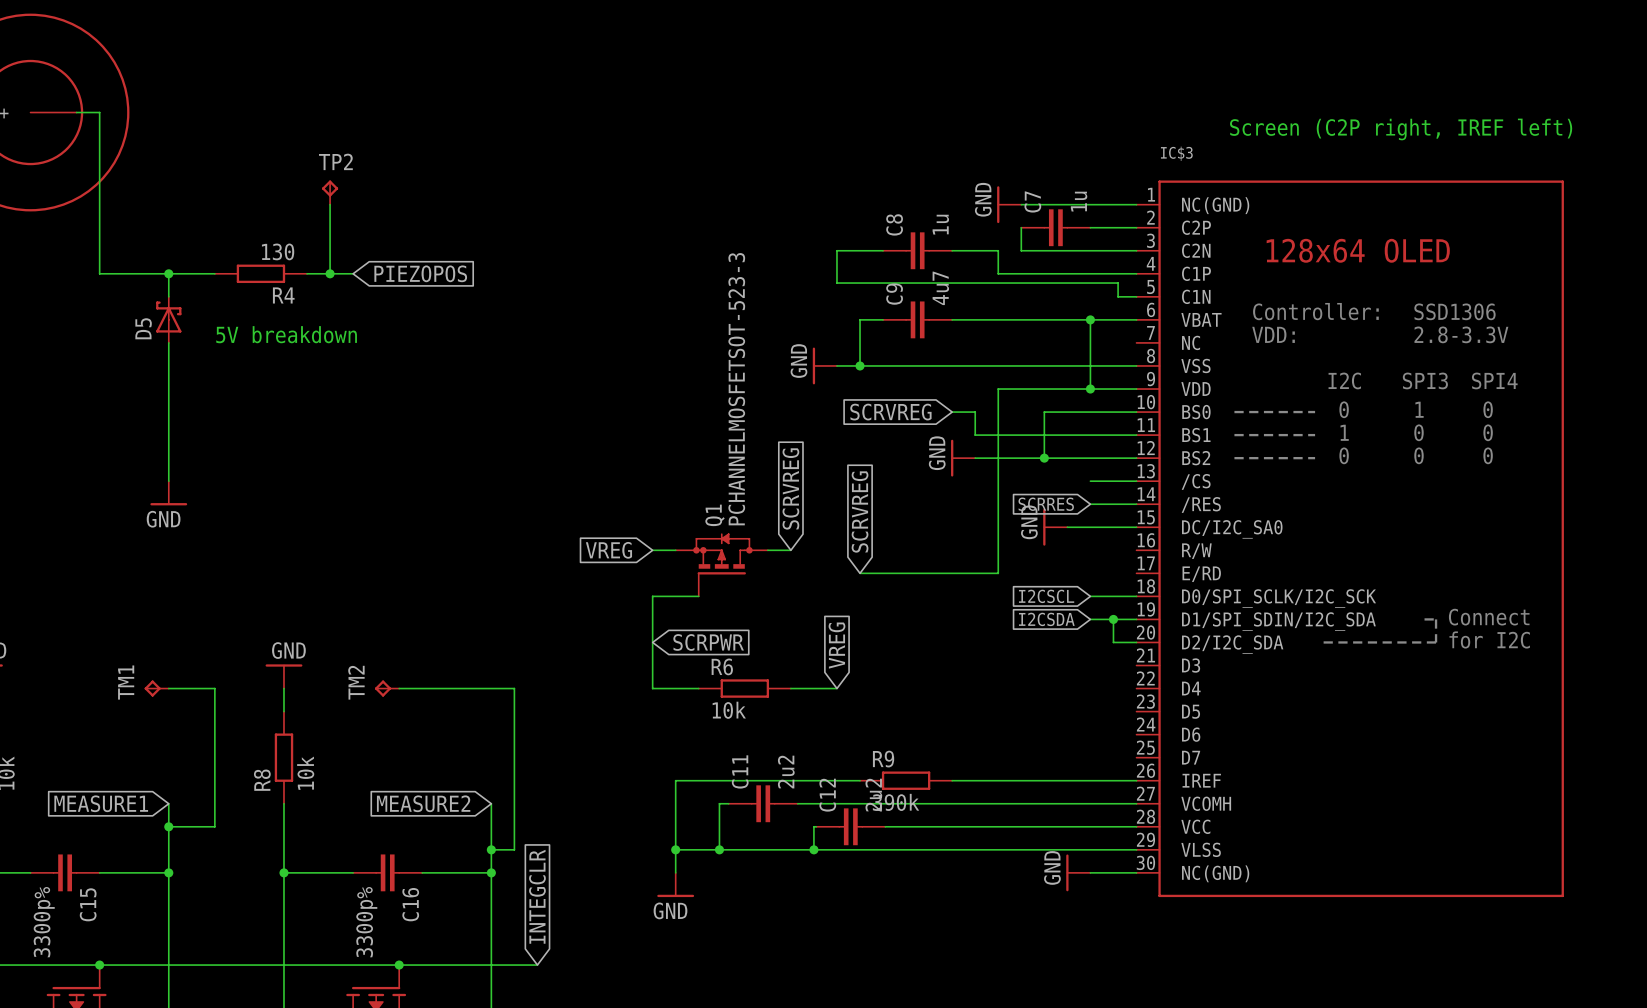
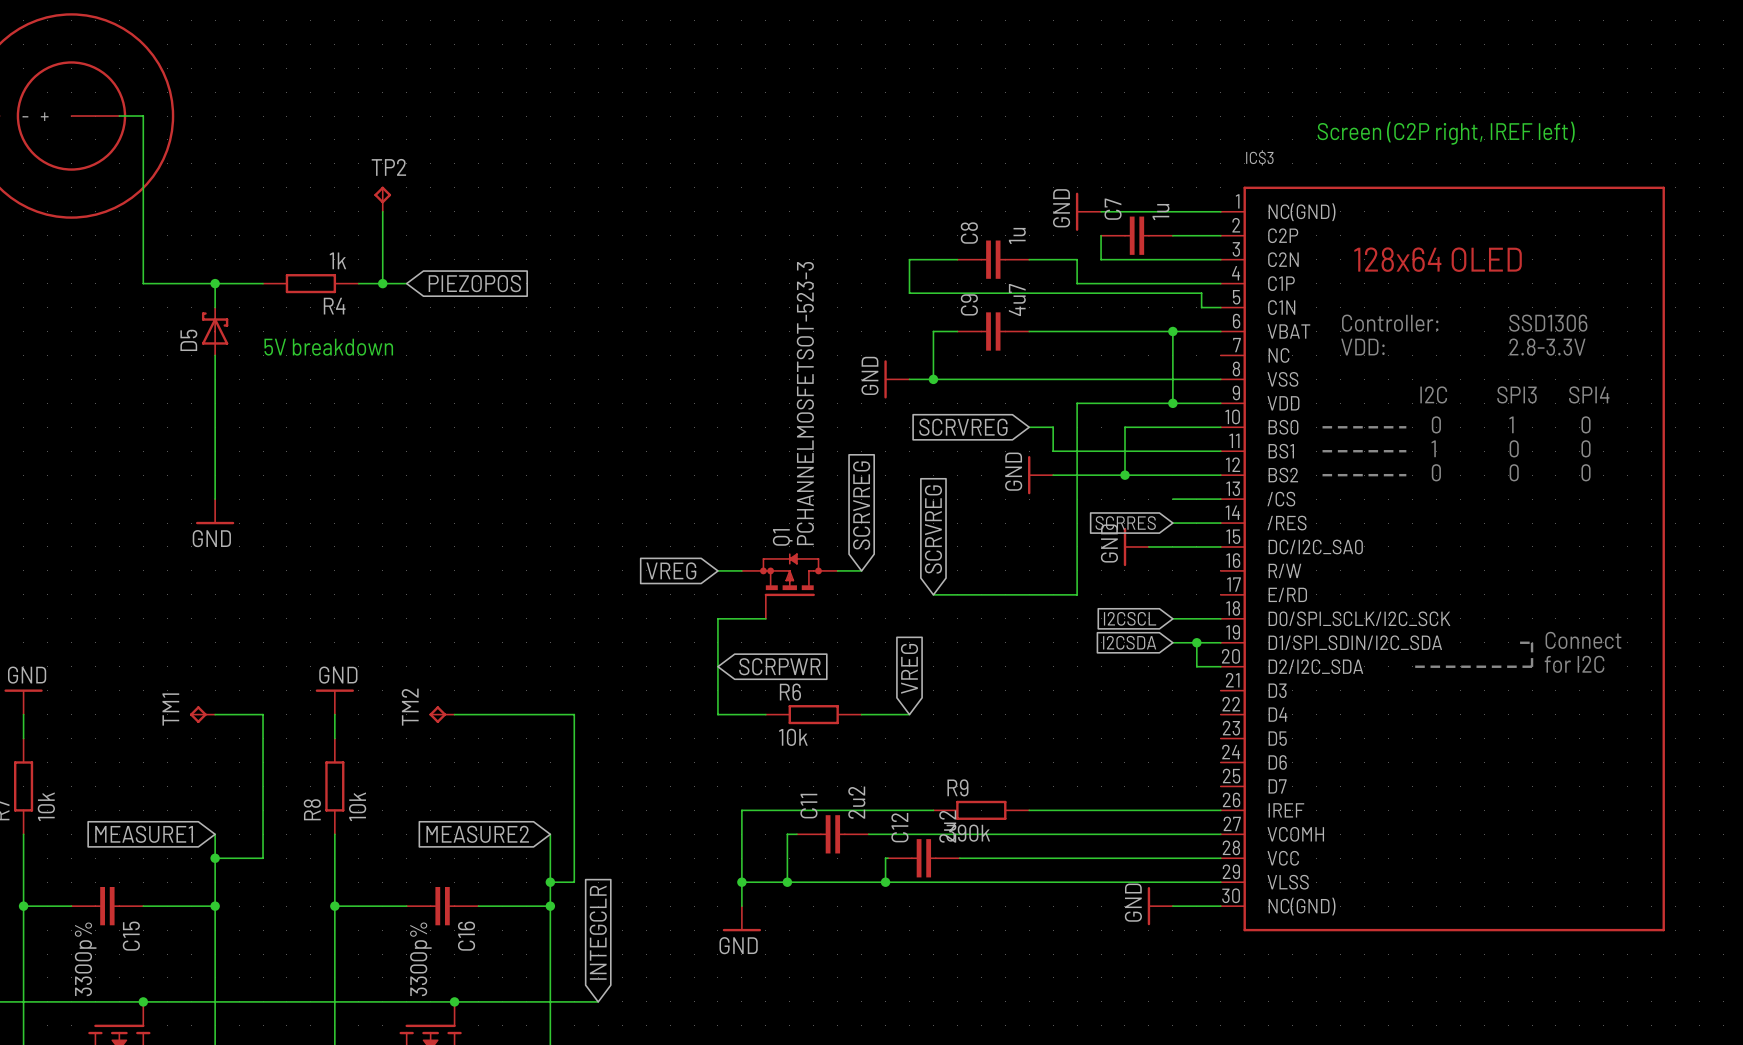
R4 value: 130 (278, 251) -> 1k (337, 260)

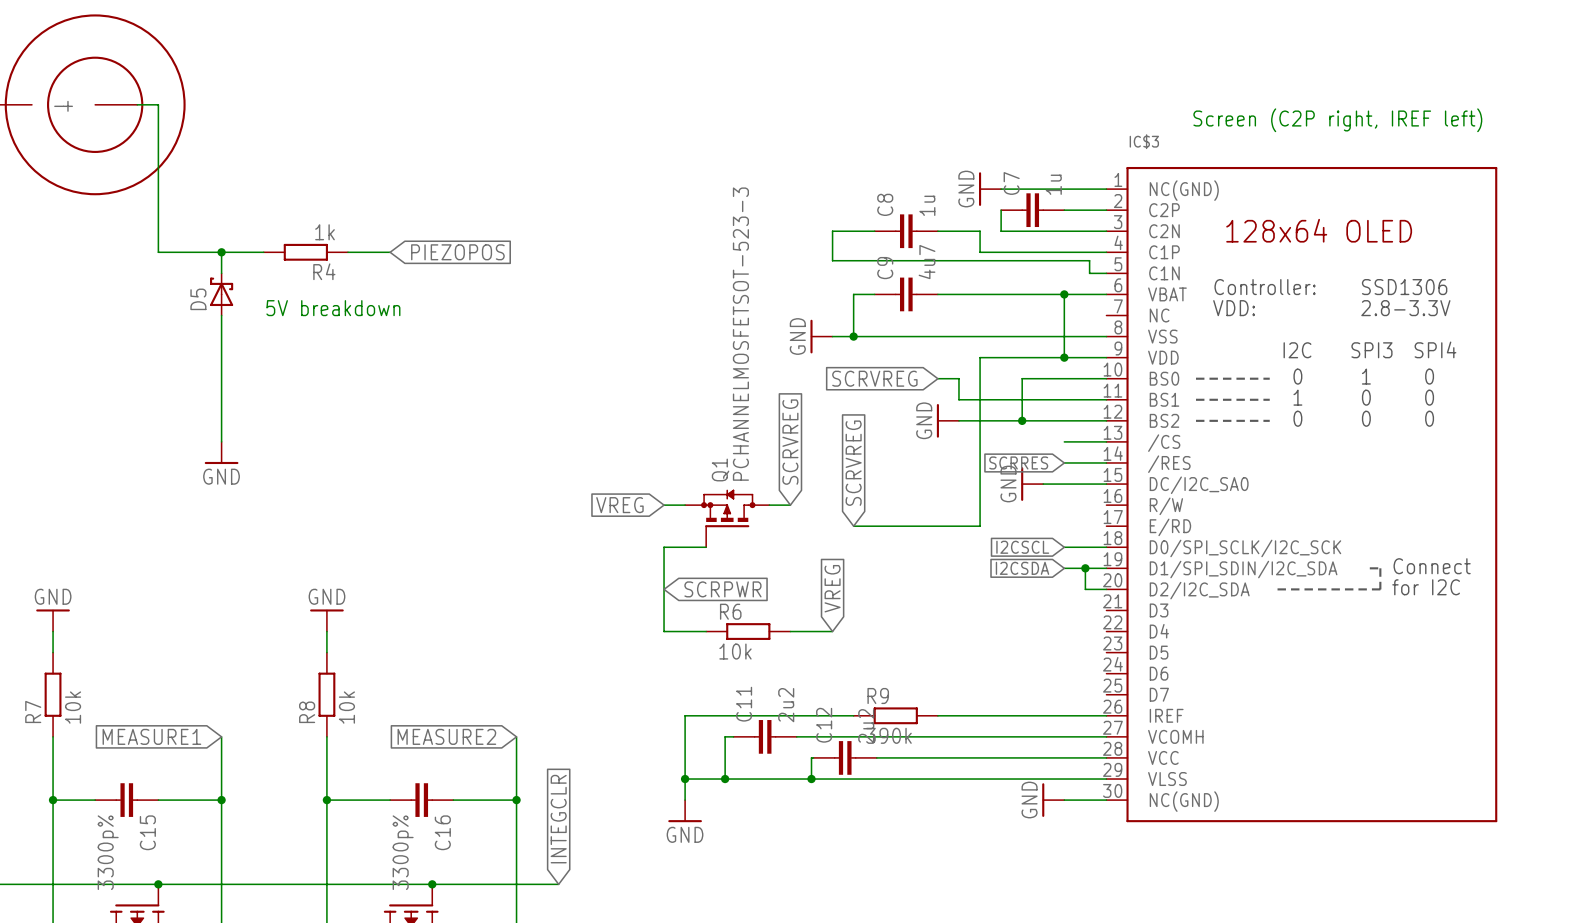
TP2: (382, 199) -> none
wire: (382, 211) (382, 283) -> none
junction: (382, 283) -> none
TM1: (202, 714) -> none
wire: (215, 714) (263, 714) (263, 858) (215, 858) -> none
TM2: (441, 714) -> none
wire: (454, 714) (574, 714) (574, 882) (550, 882) -> none
junction: (215, 858) -> none
junction: (550, 882) -> none

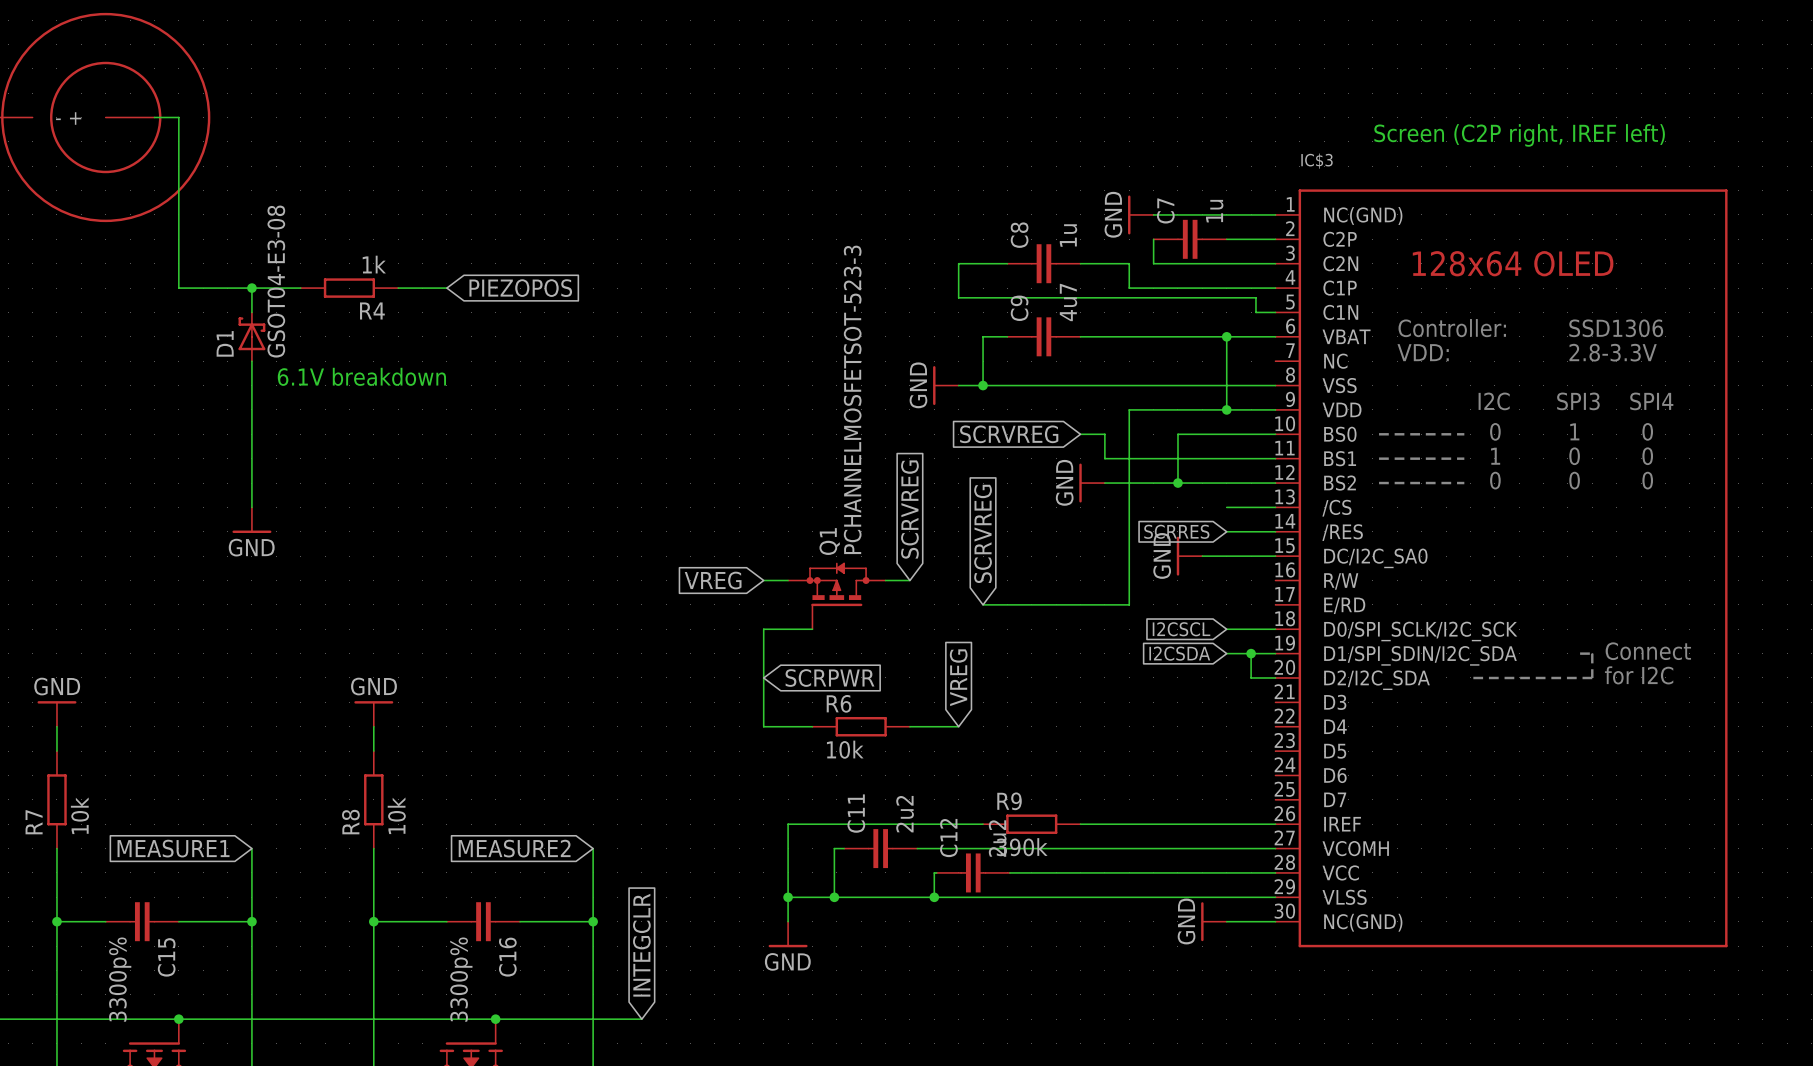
D5 value: none -> GSOT04-E3-08 (276, 281)
D5 name: D5 (198, 299) -> D1 (225, 343)
text: 5V breakdown (333, 308) -> 6.1V breakdown (361, 376)

